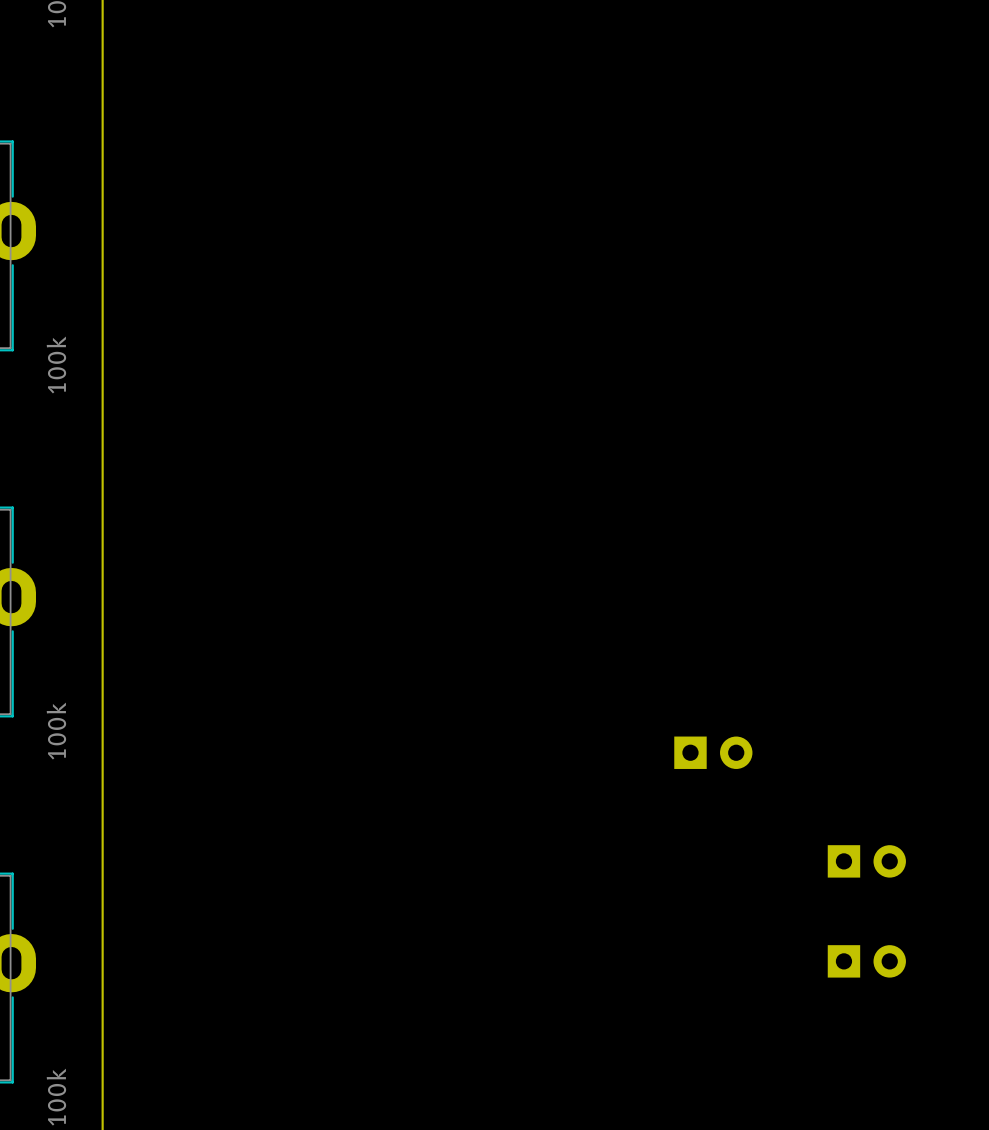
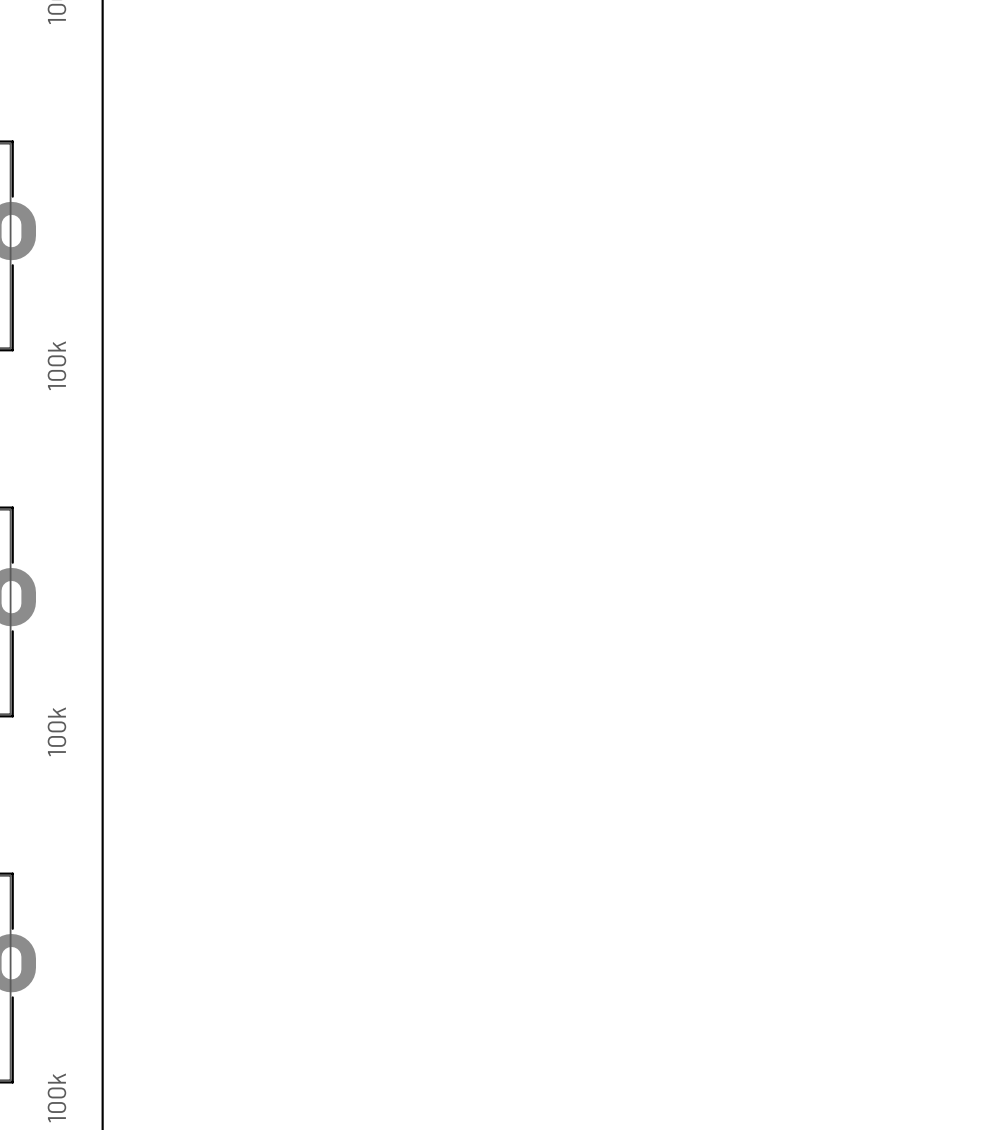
part: (713, 752) -> none
part: (866, 861) -> none
part: (866, 961) -> none

